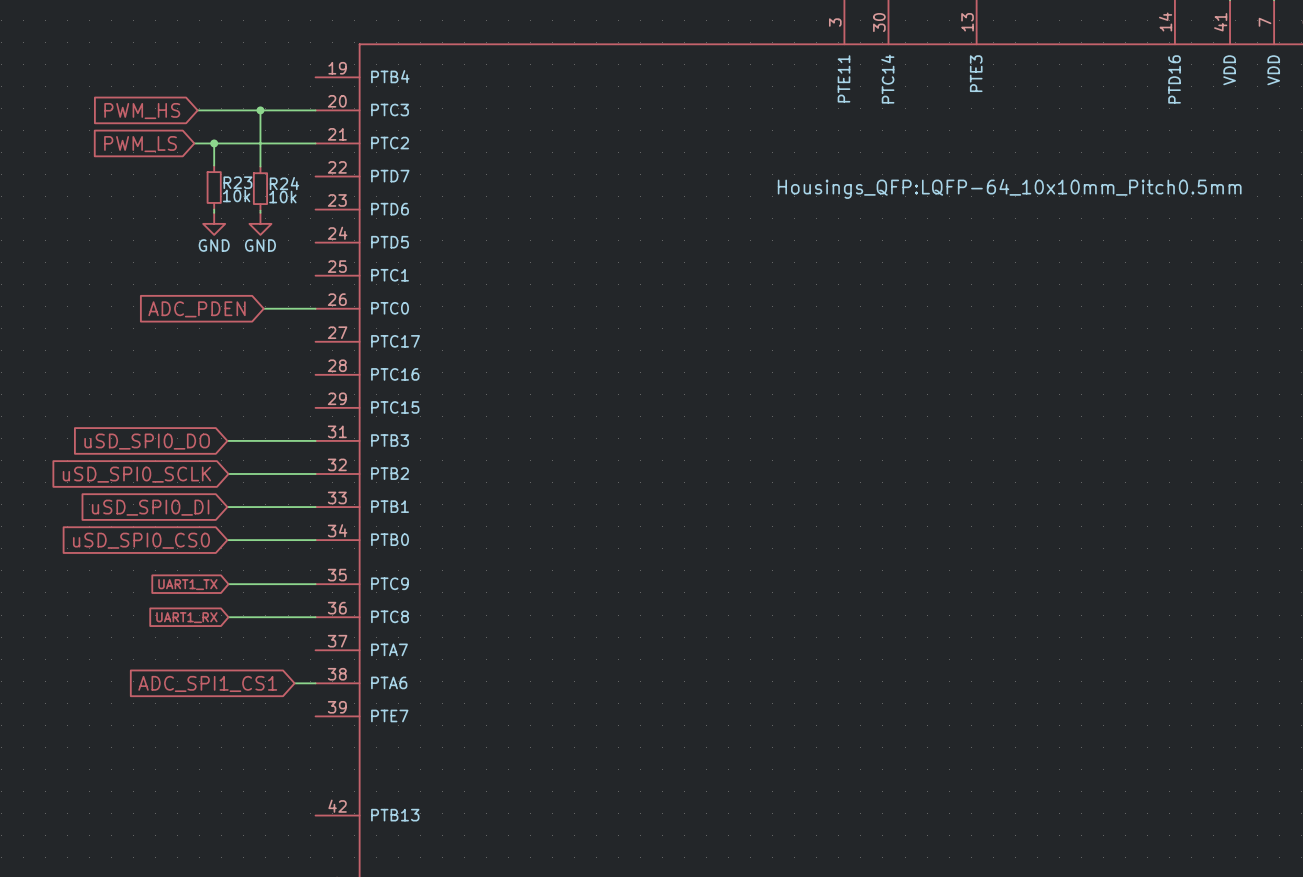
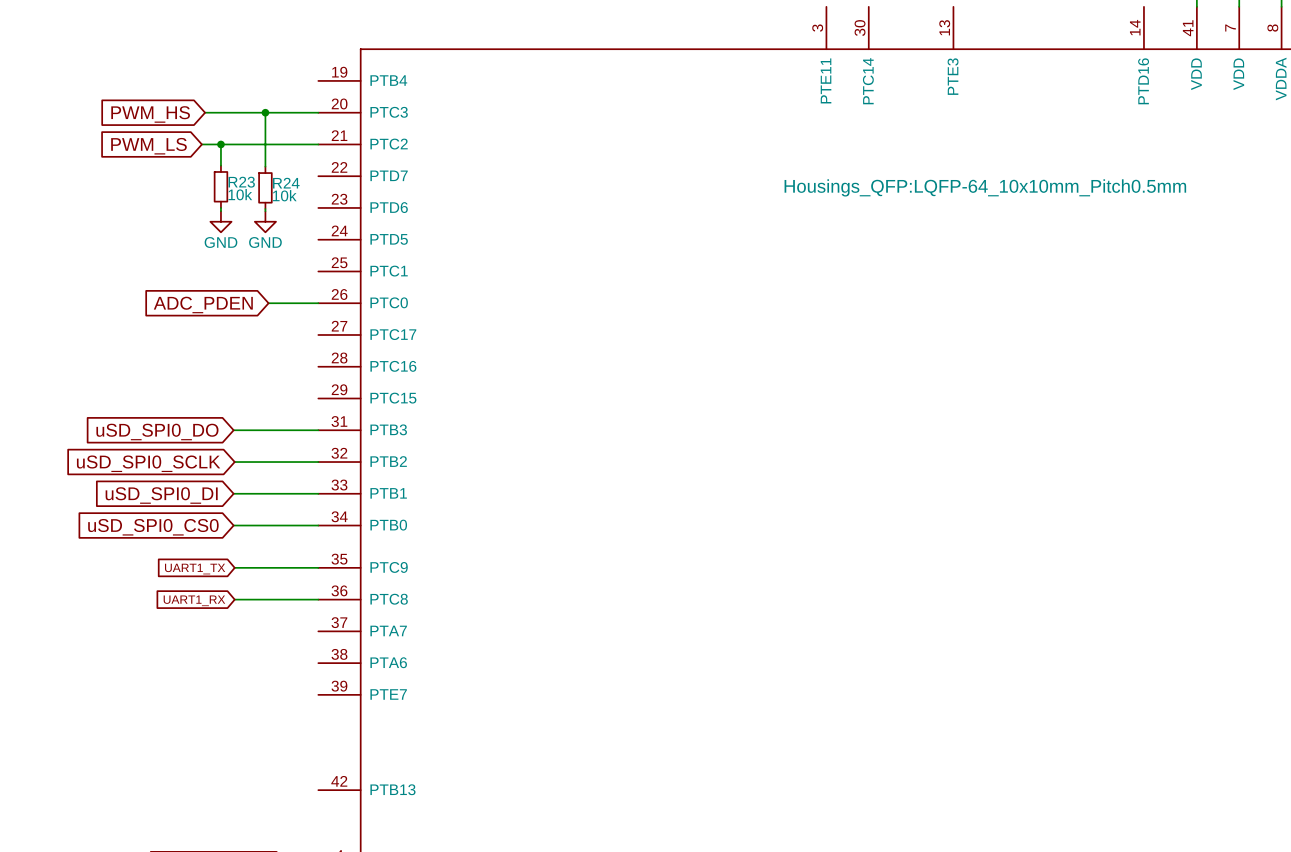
global label: ADC_SPI1_CS1 (207, 683) -> none
wire: (294, 683) (315, 683) -> none

